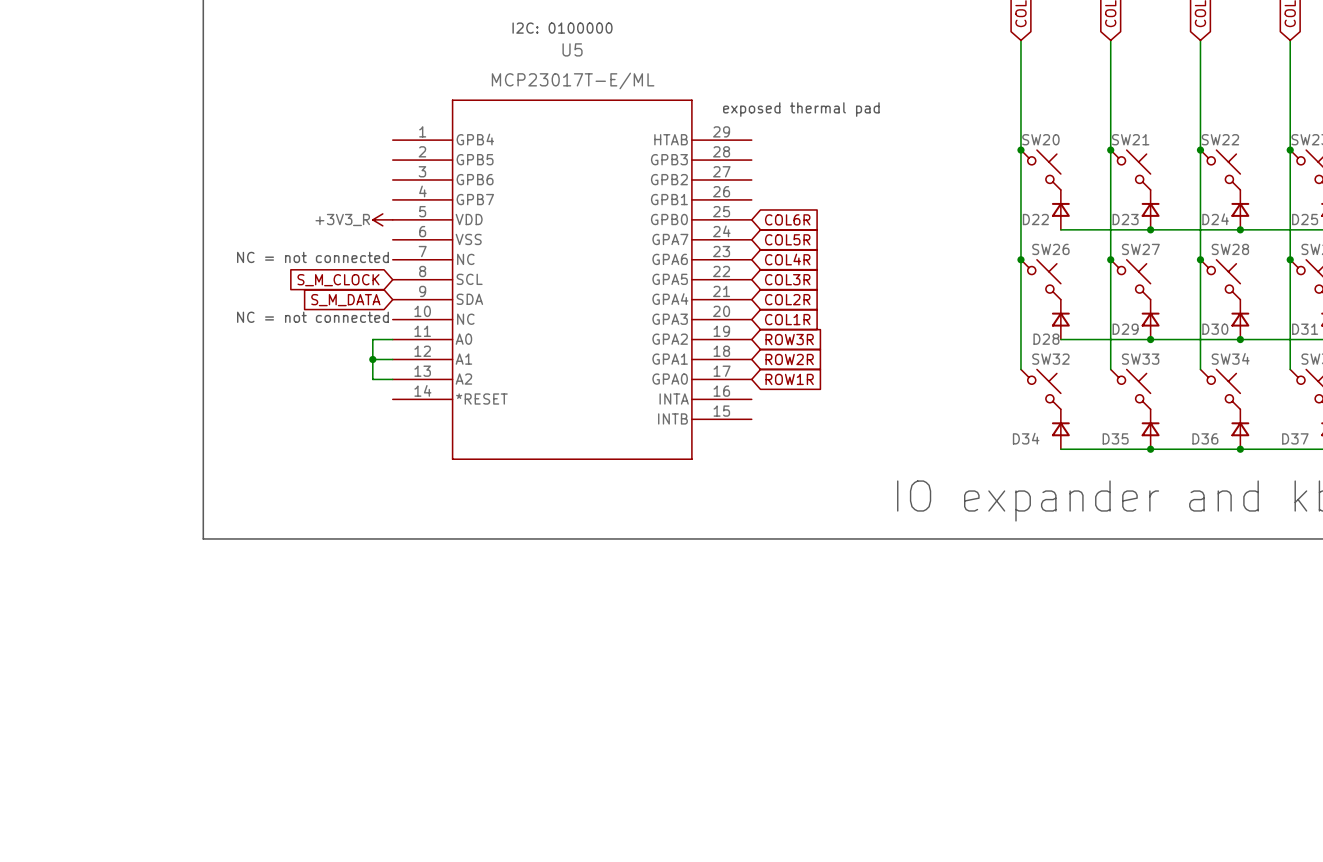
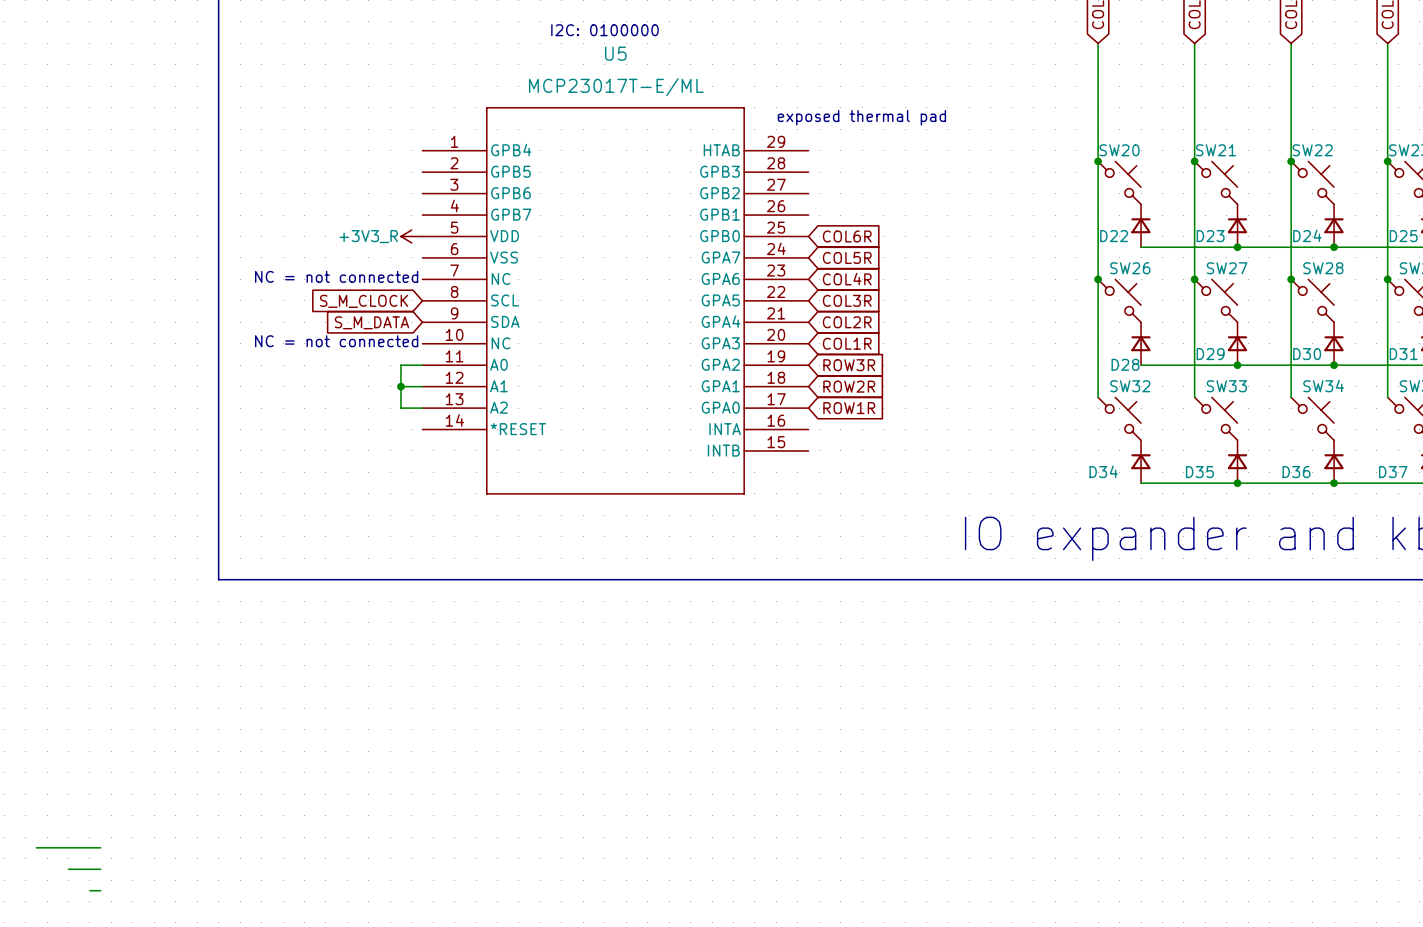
wire: none -> (36, 847) (100, 847)
wire: none -> (68, 869) (100, 869)
wire: none -> (89, 890) (100, 890)

